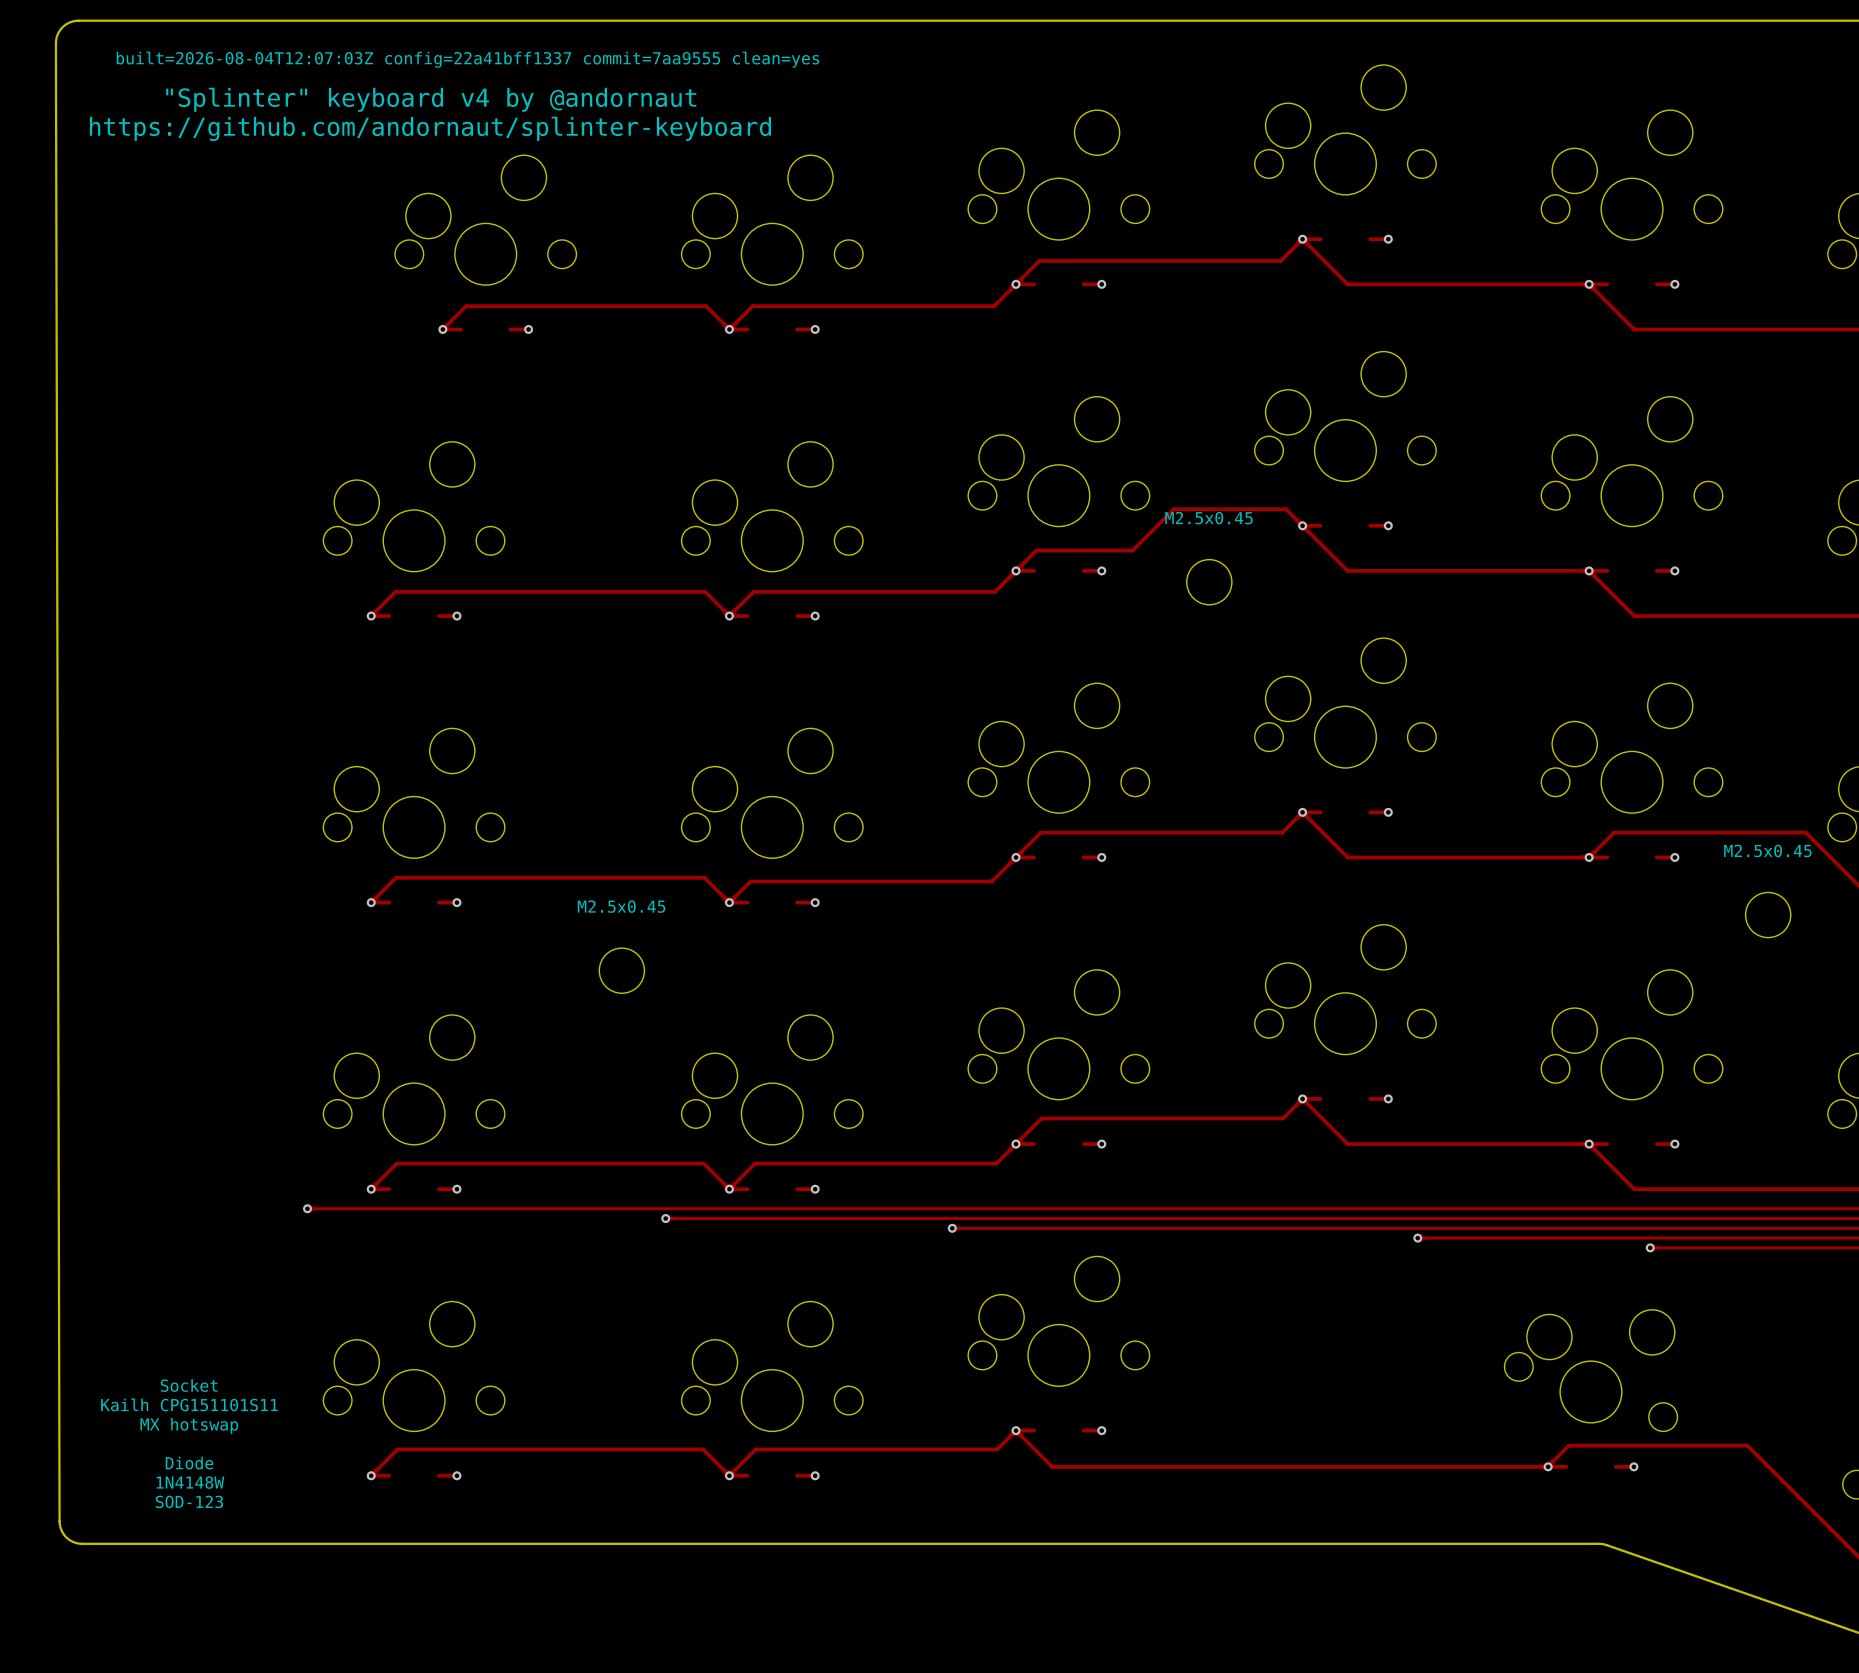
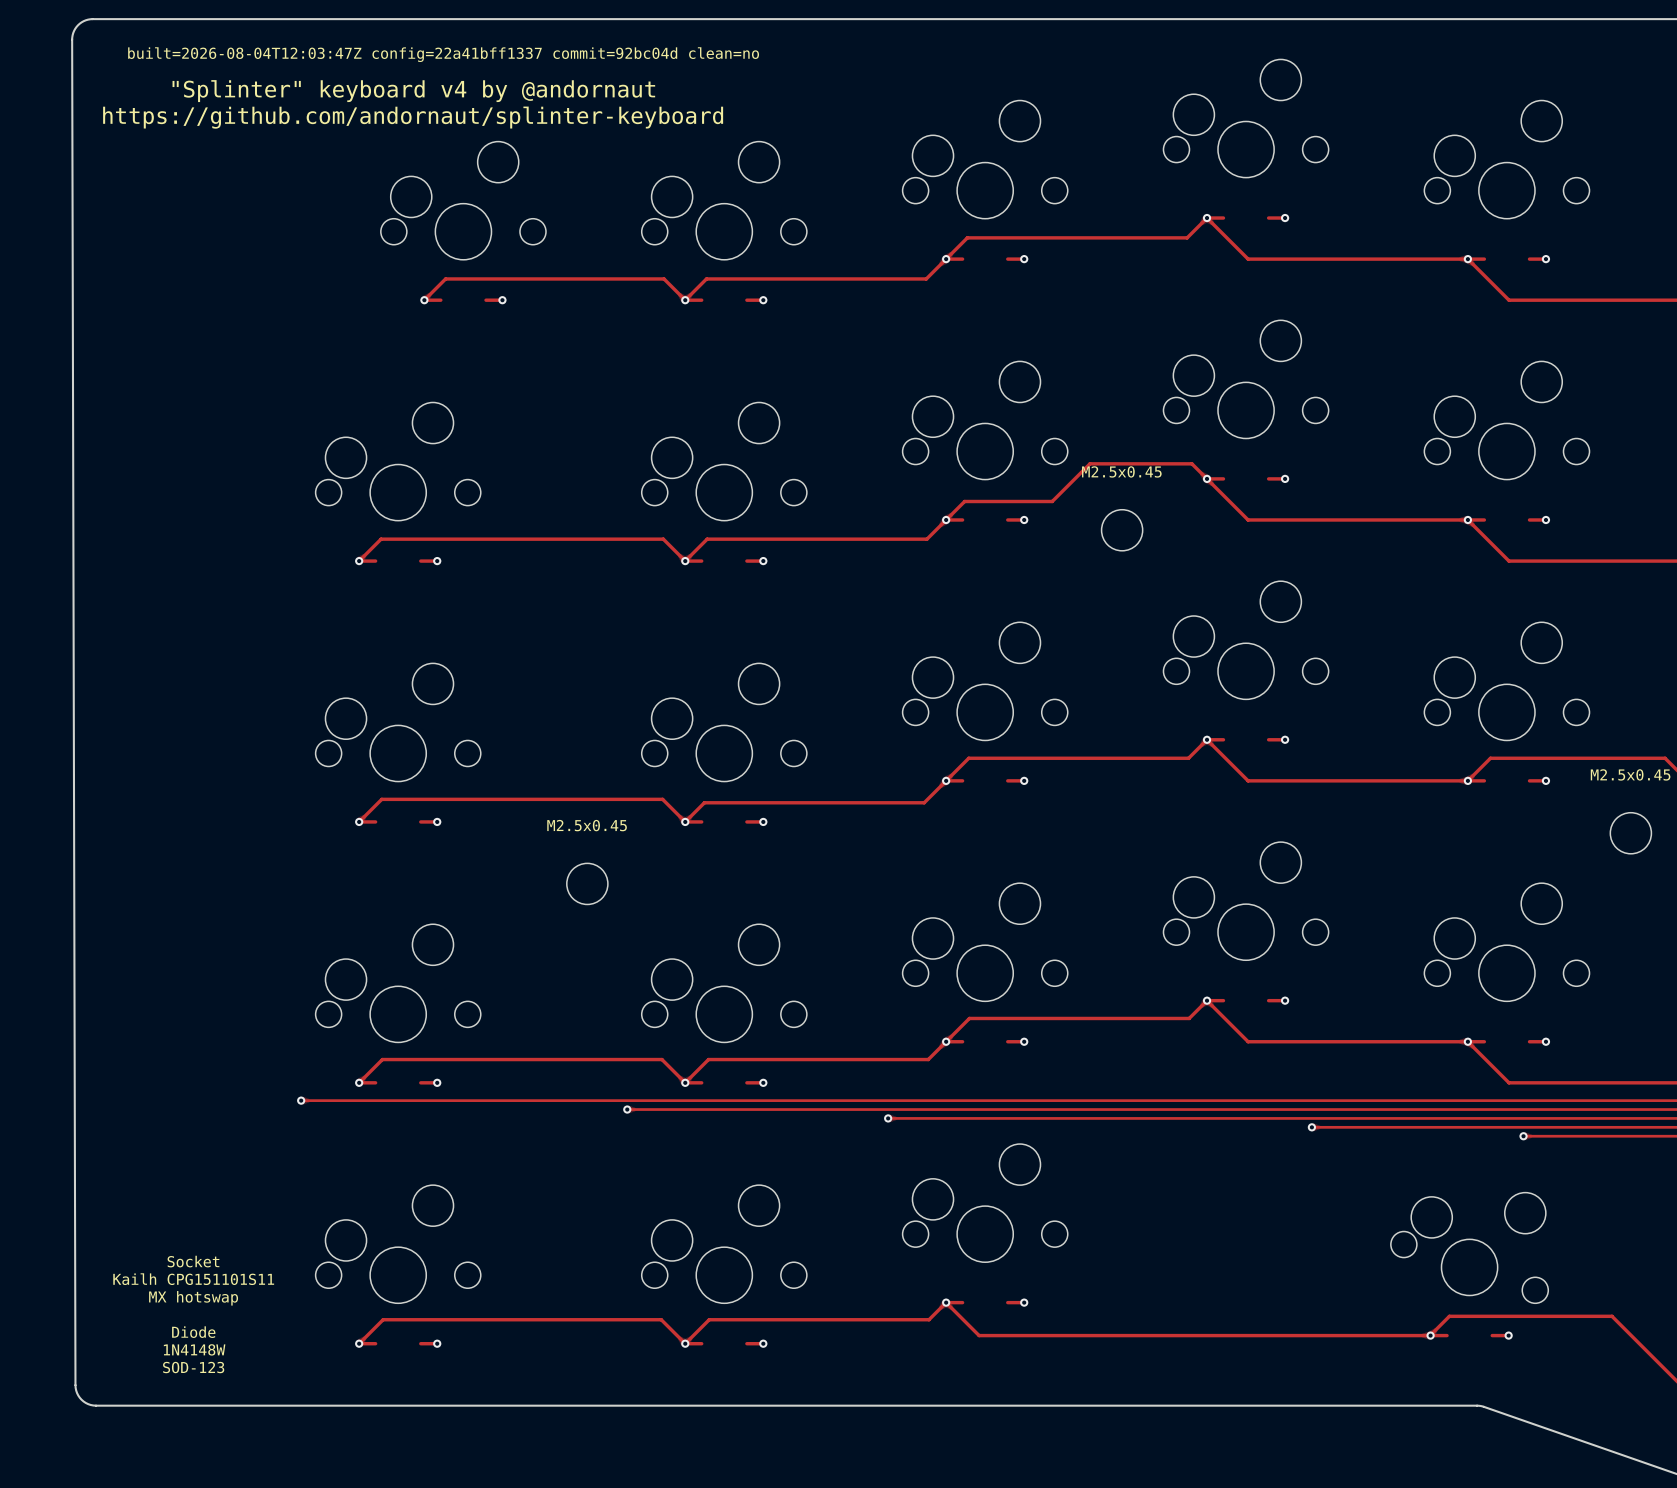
text: built=2026-08-04T12:07:03Z config=22a41bff1337 commit=7aa9555 clean=yes (467, 59) -> built=2026-08-04T12:03:47Z config=22a41bff1337 commit=92bc04d clean=no (443, 54)

